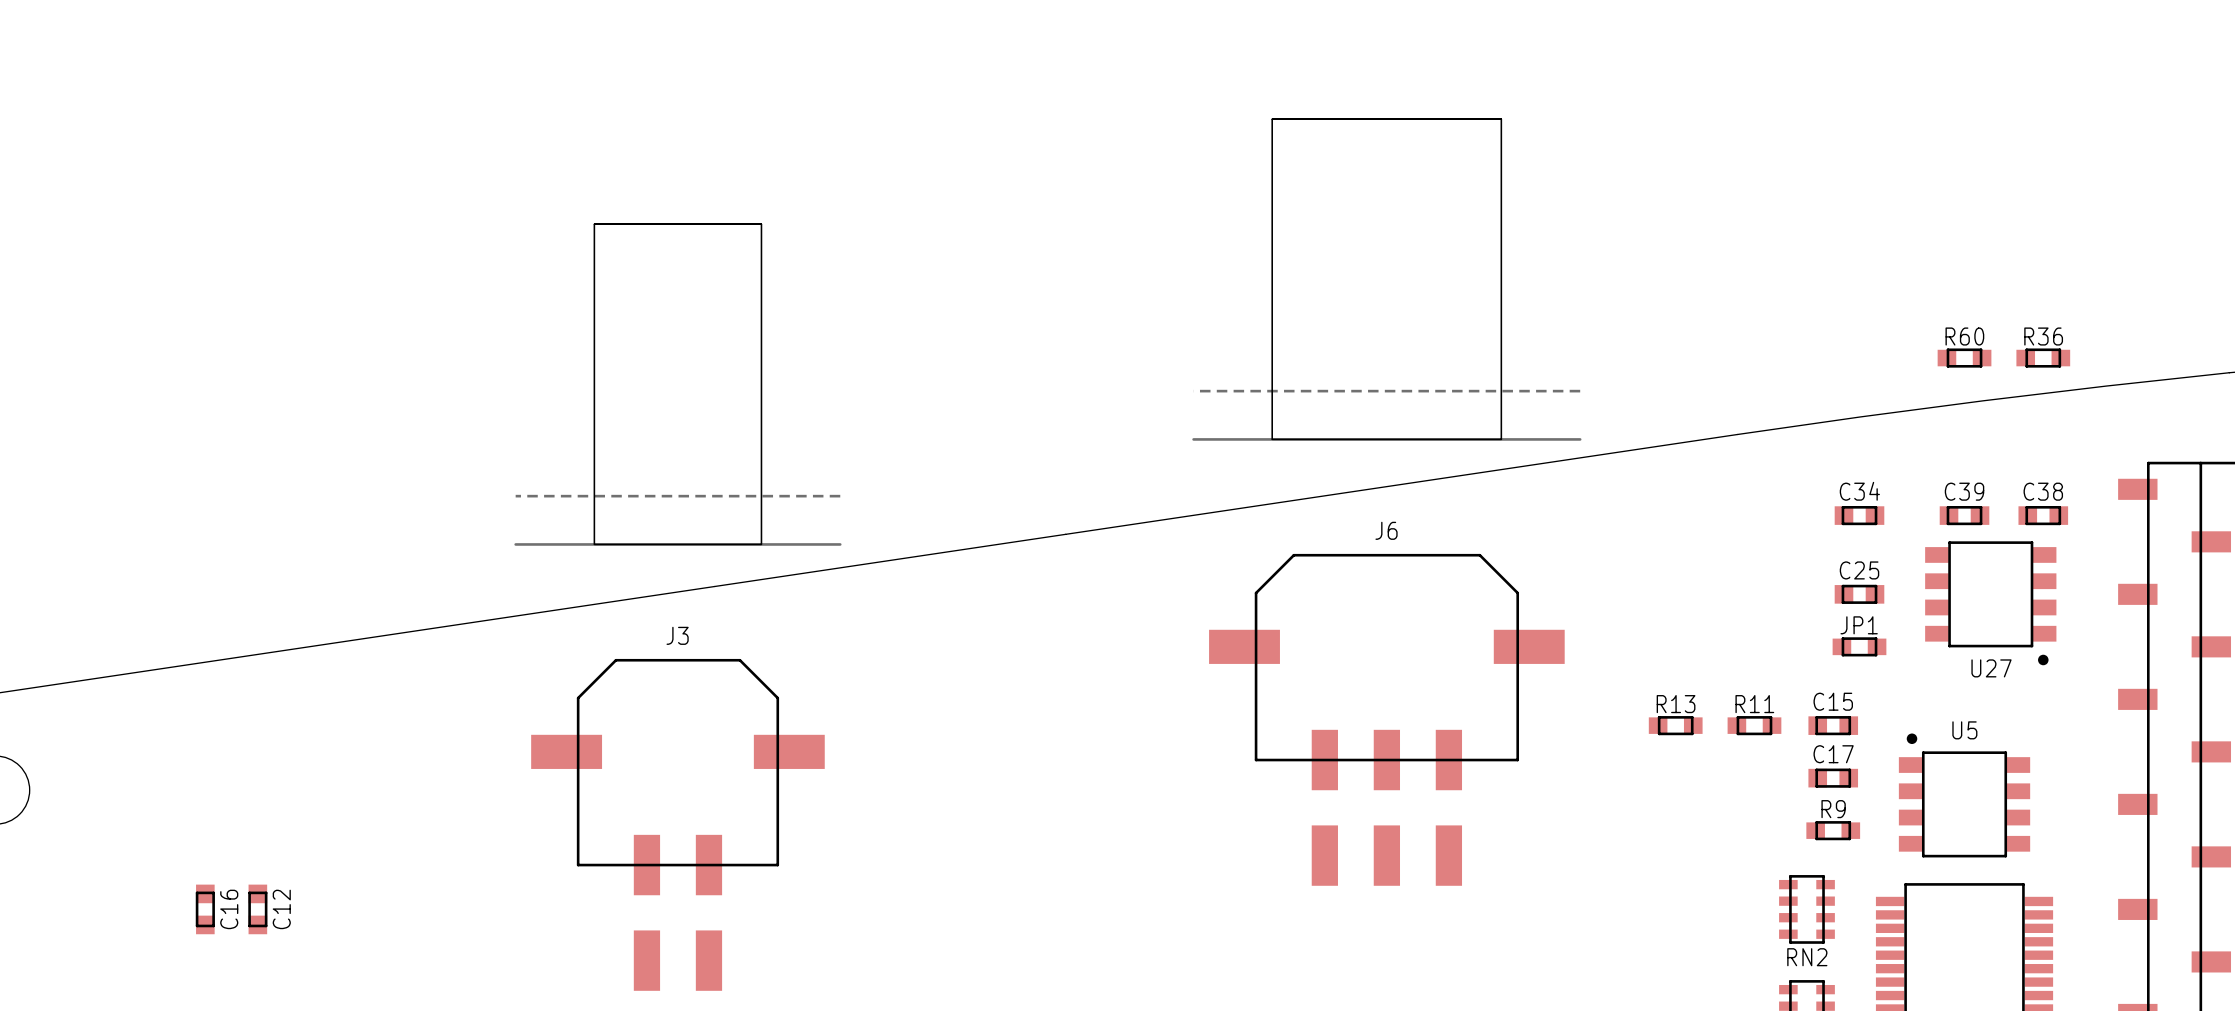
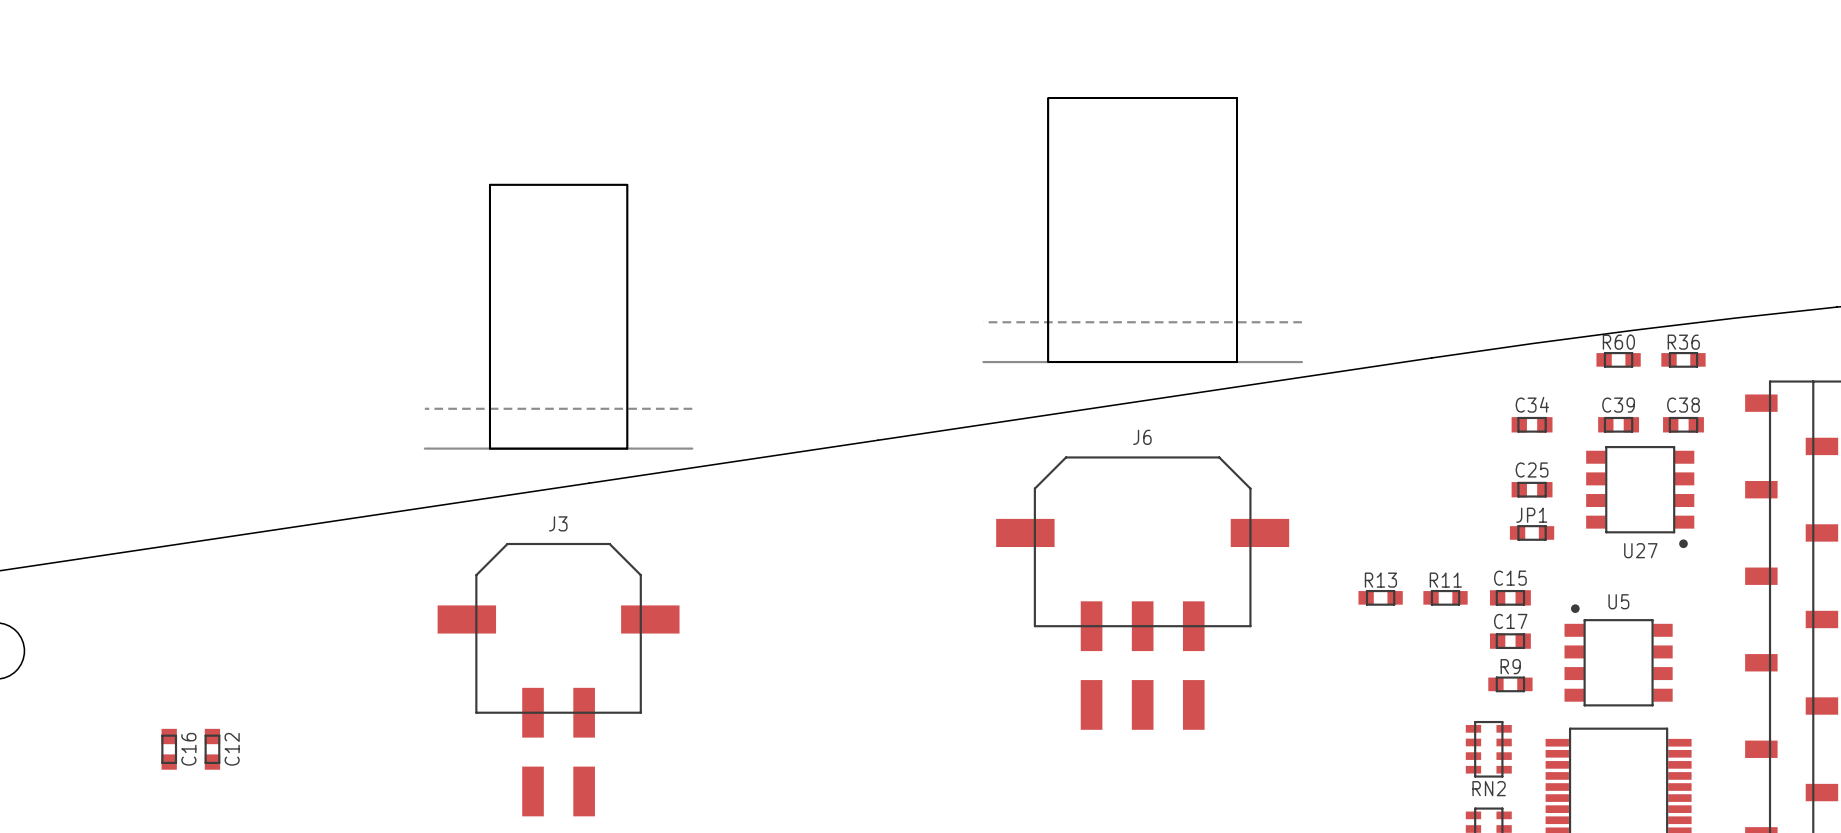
R60 position: (1964, 358) -> (1618, 359)
R36 position: (2043, 358) -> (1683, 359)

